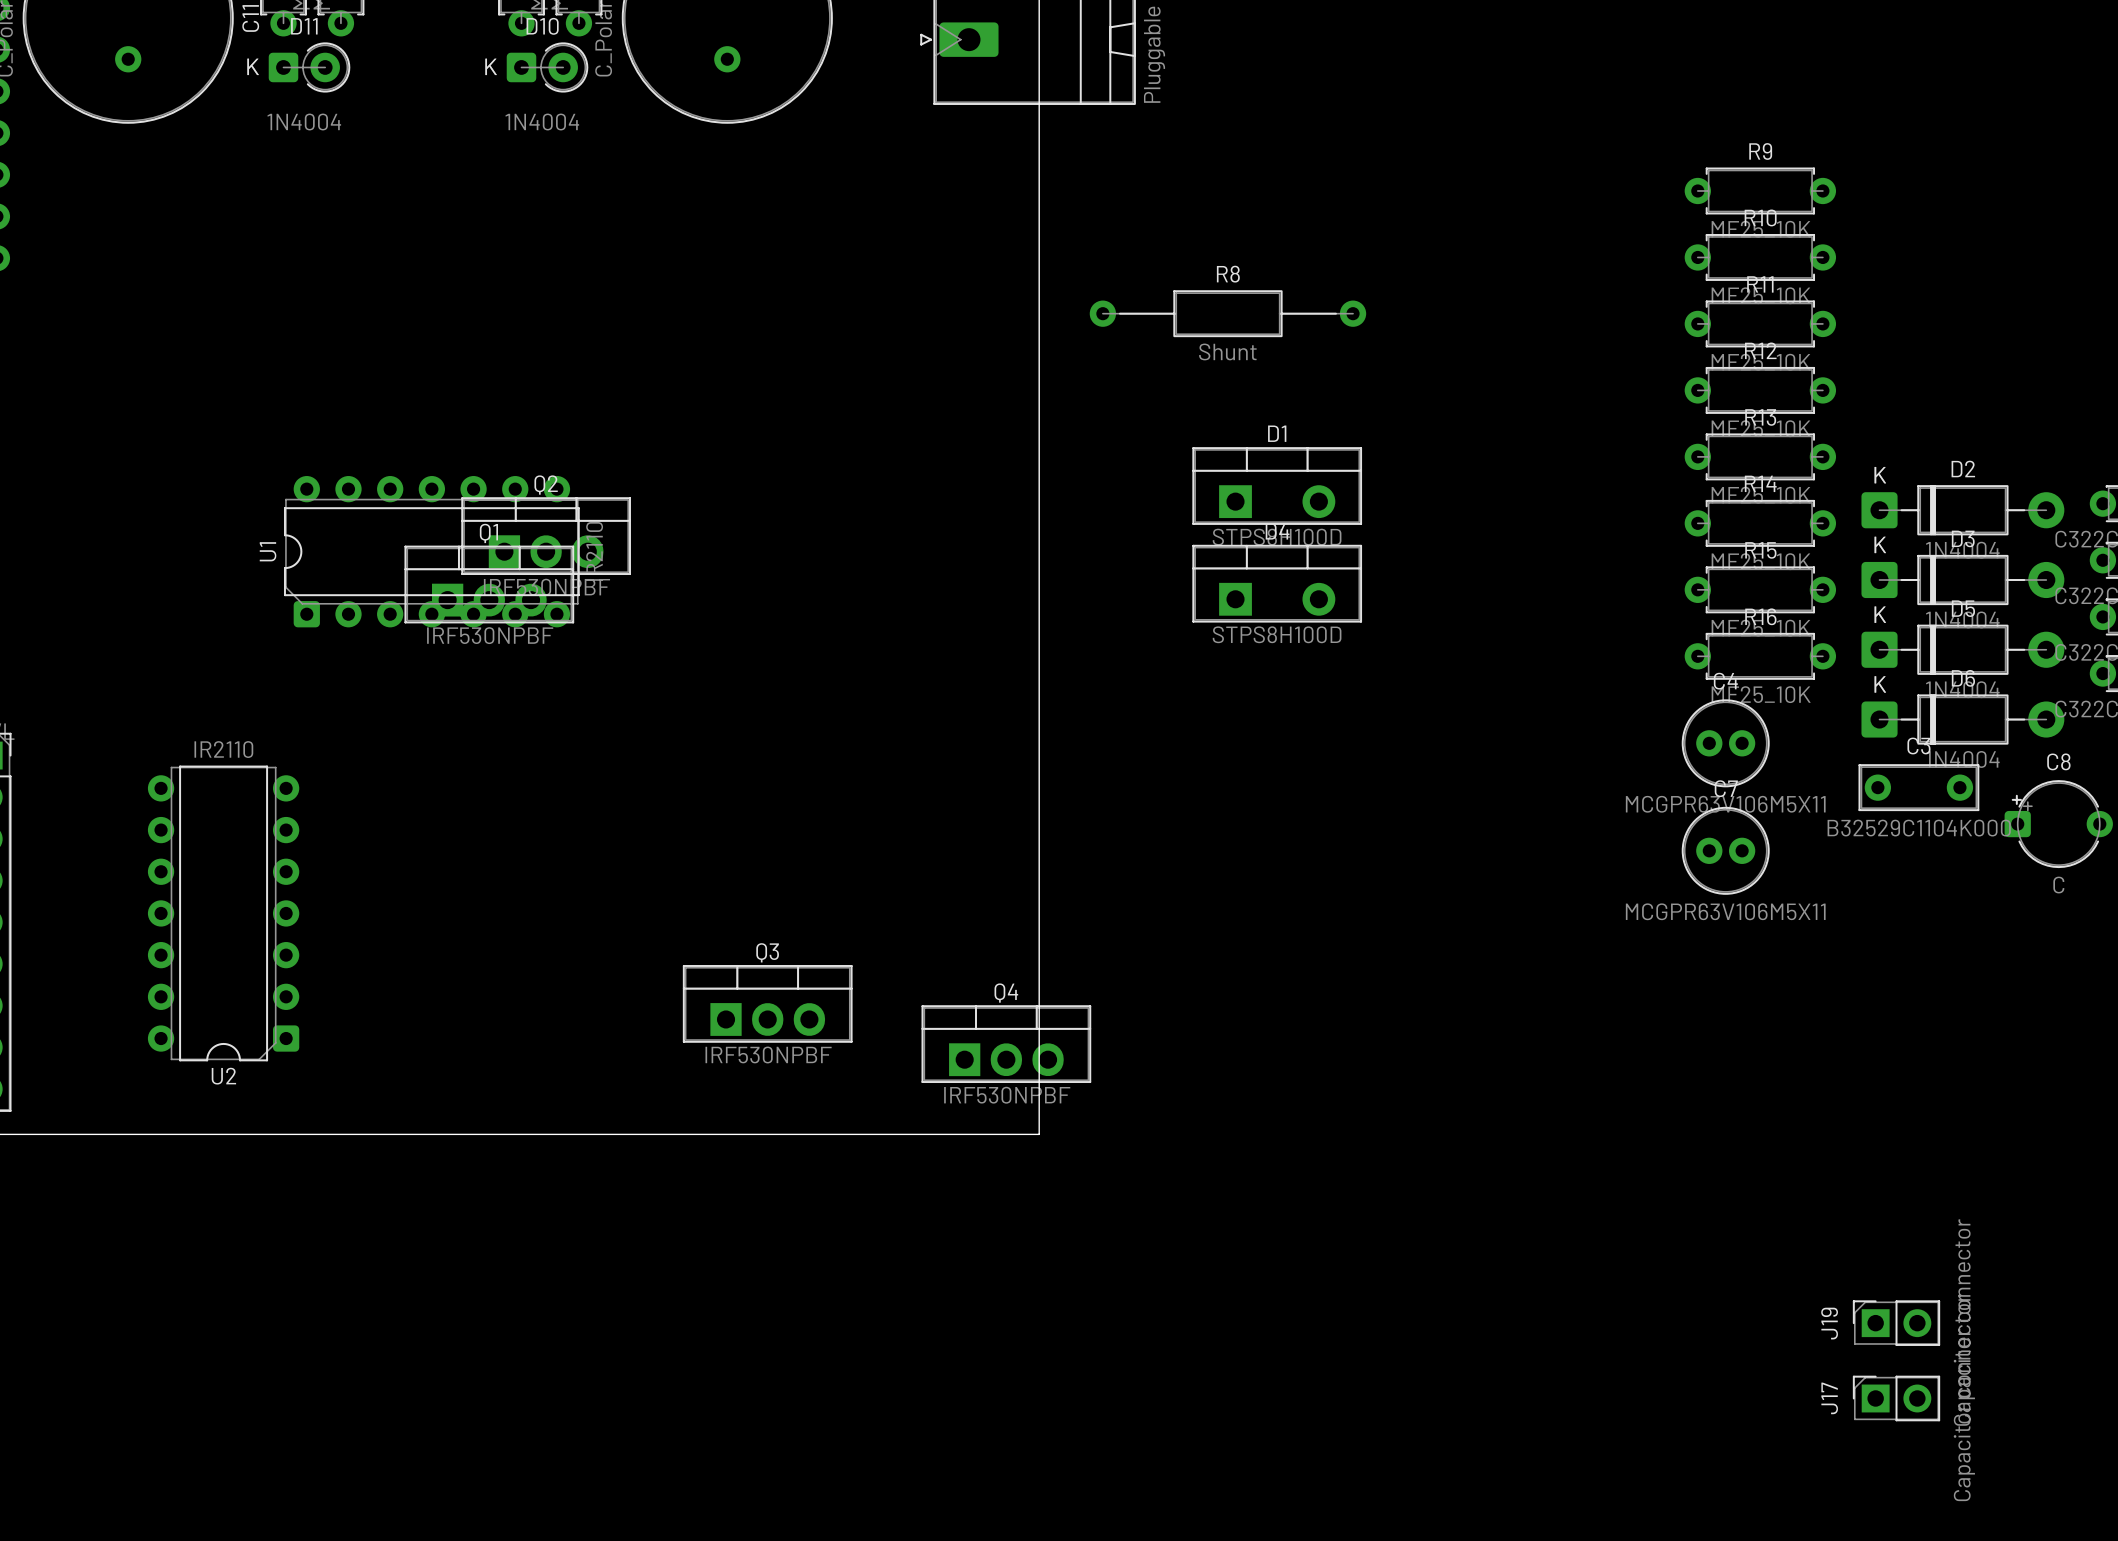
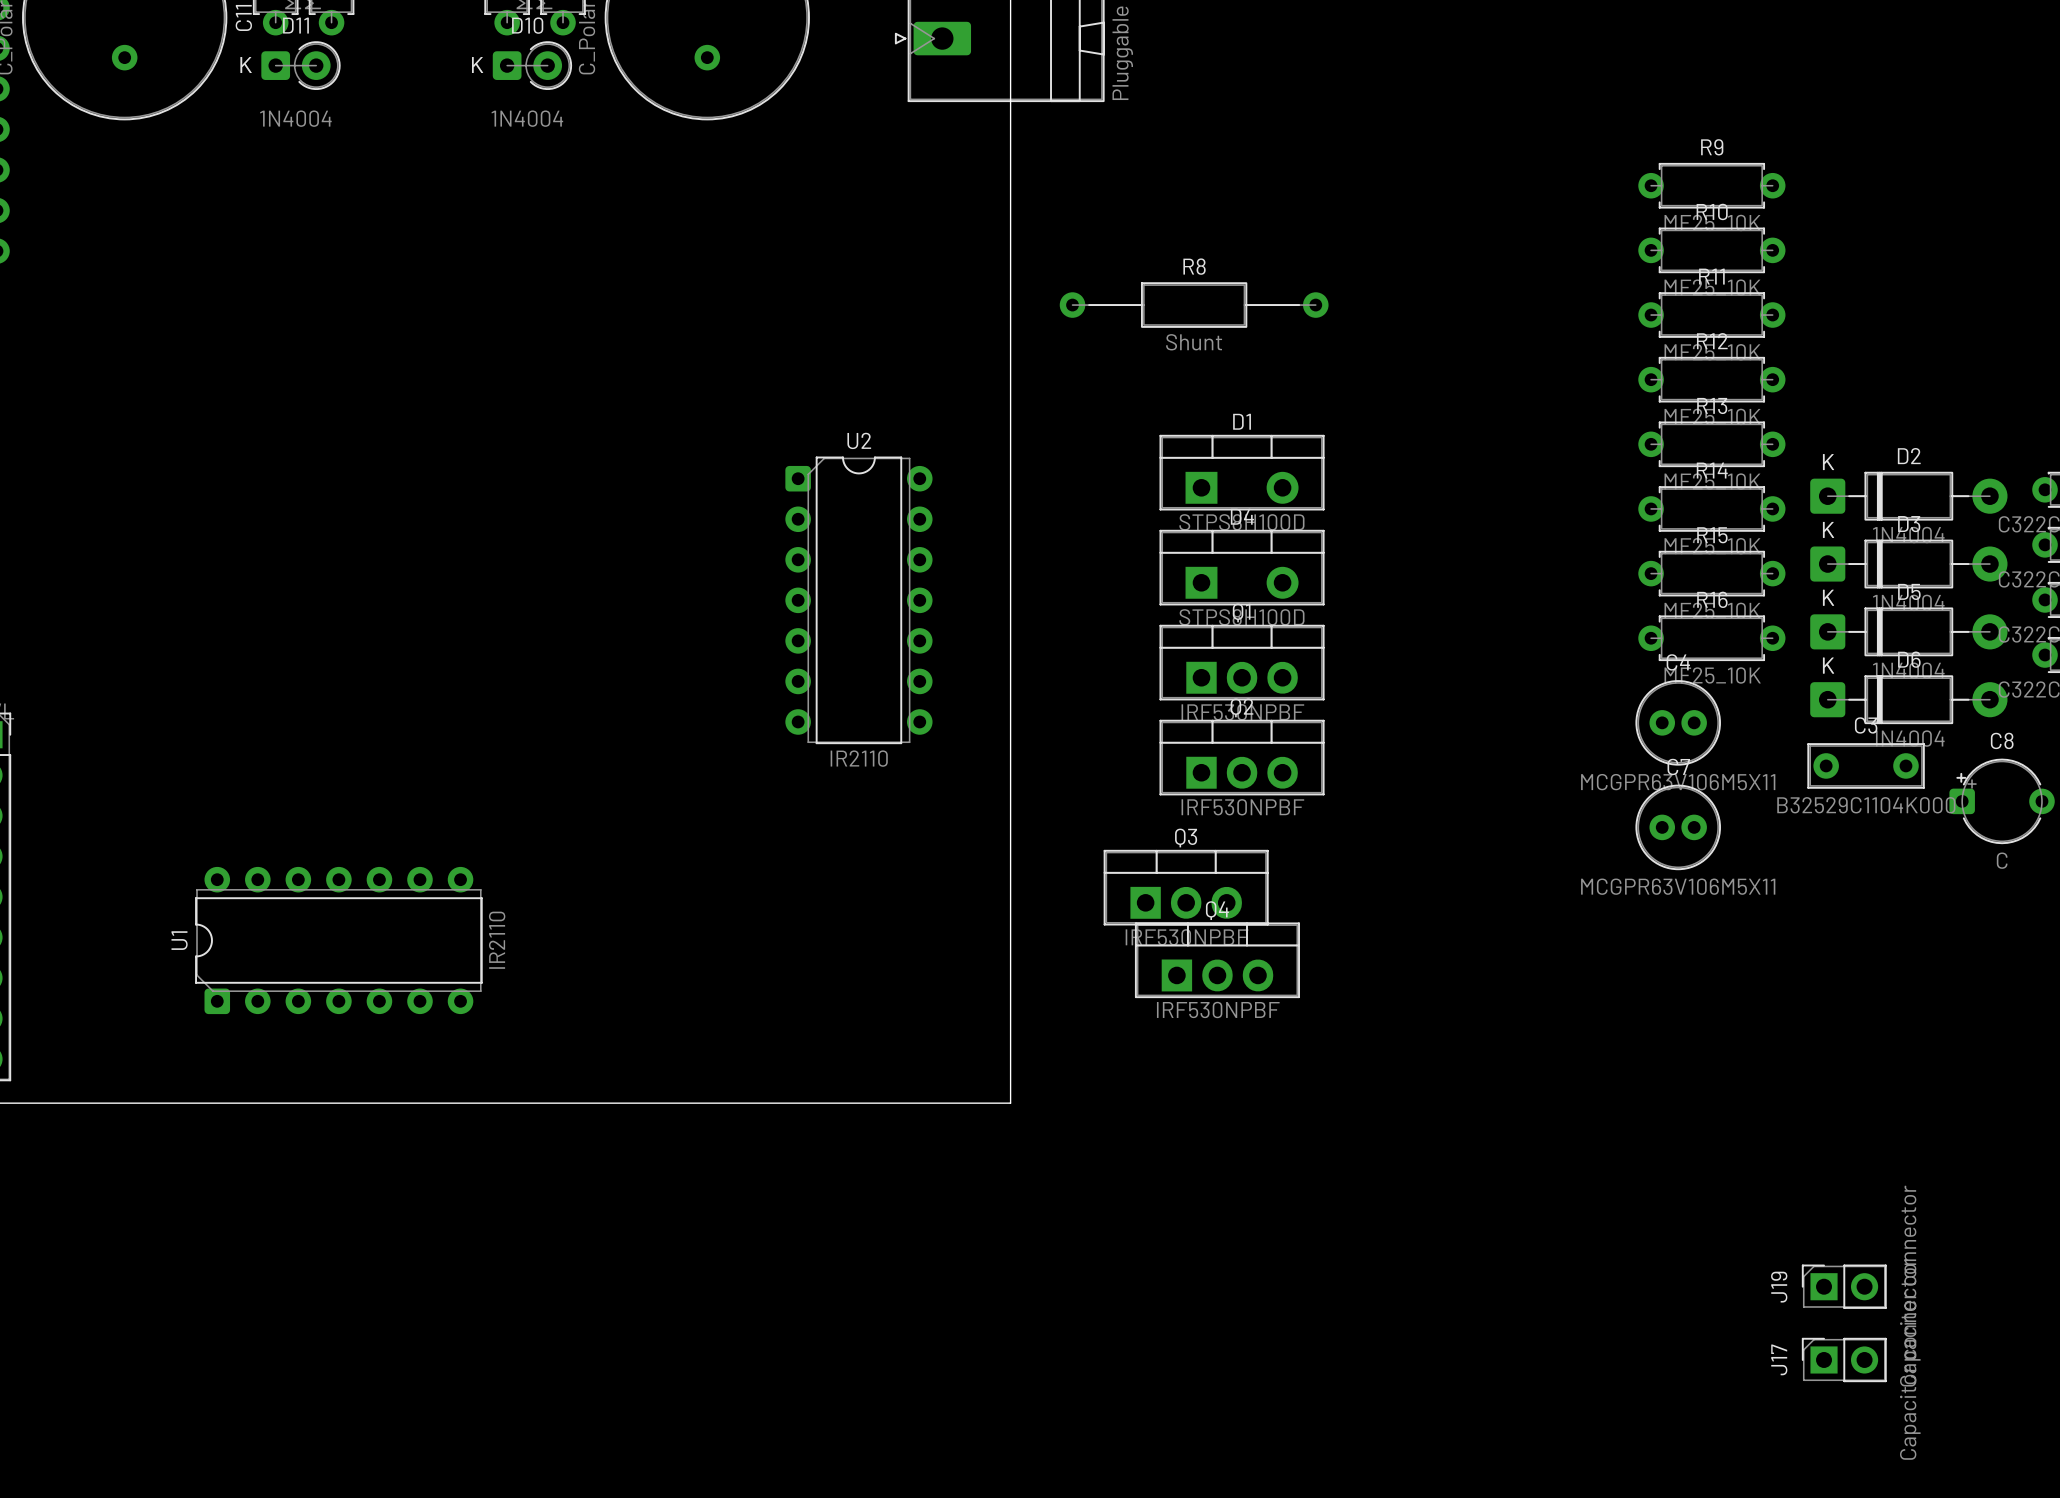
Q2 position: (546, 536) -> (1242, 757)
U1 position: (431, 551) -> (338, 940)
Q1 position: (489, 584) -> (1242, 662)
U2 rotation: 0° (223, 913) -> 180° (858, 600)
U2 position: (223, 913) -> (858, 600)
Q3 position: (767, 1003) -> (1186, 887)
Q4 position: (1006, 1044) -> (1217, 960)

